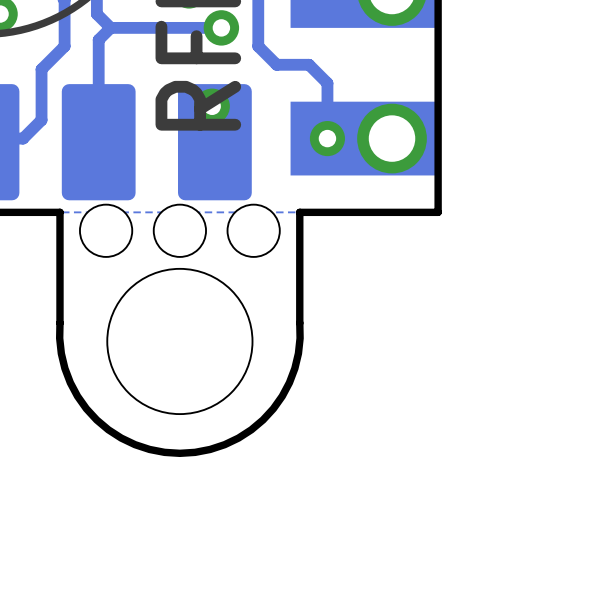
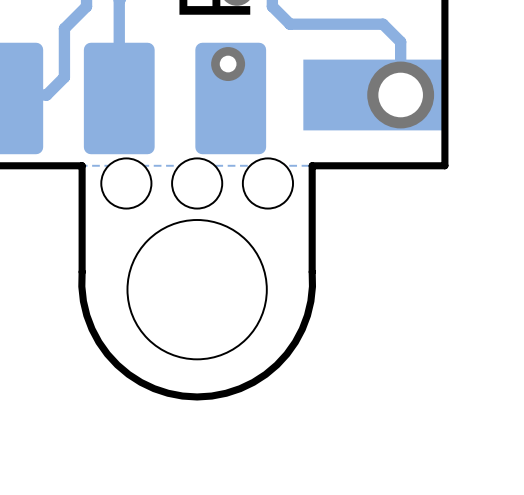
track: (309, 64) (327, 83) (327, 138) -> (321, 24) (382, 24) (400, 41) (400, 95)
via: (327, 138) -> none

